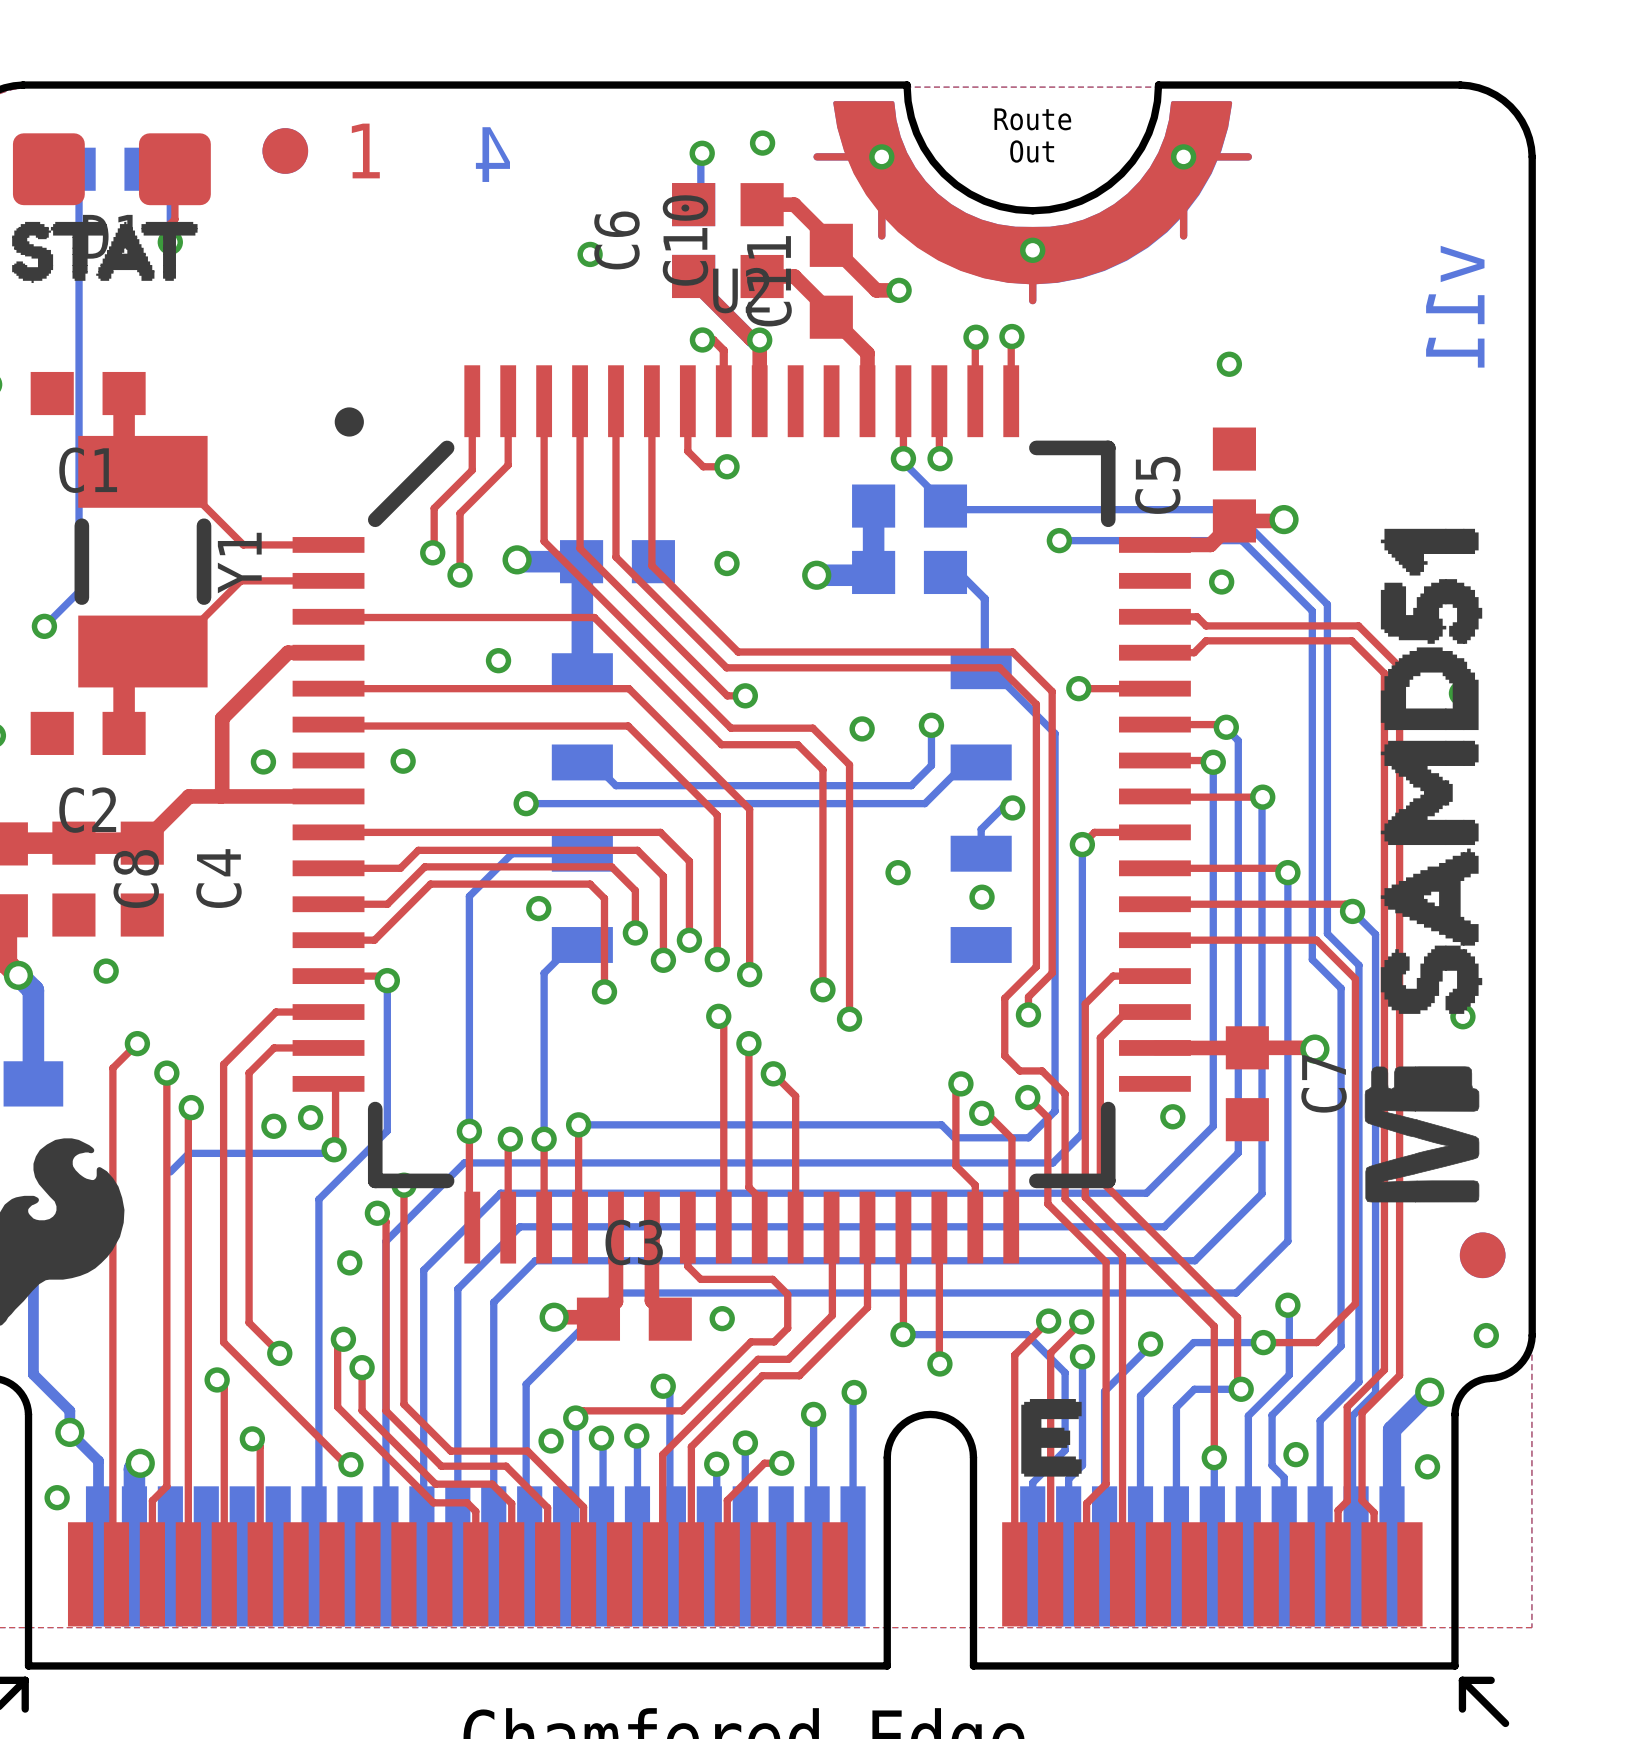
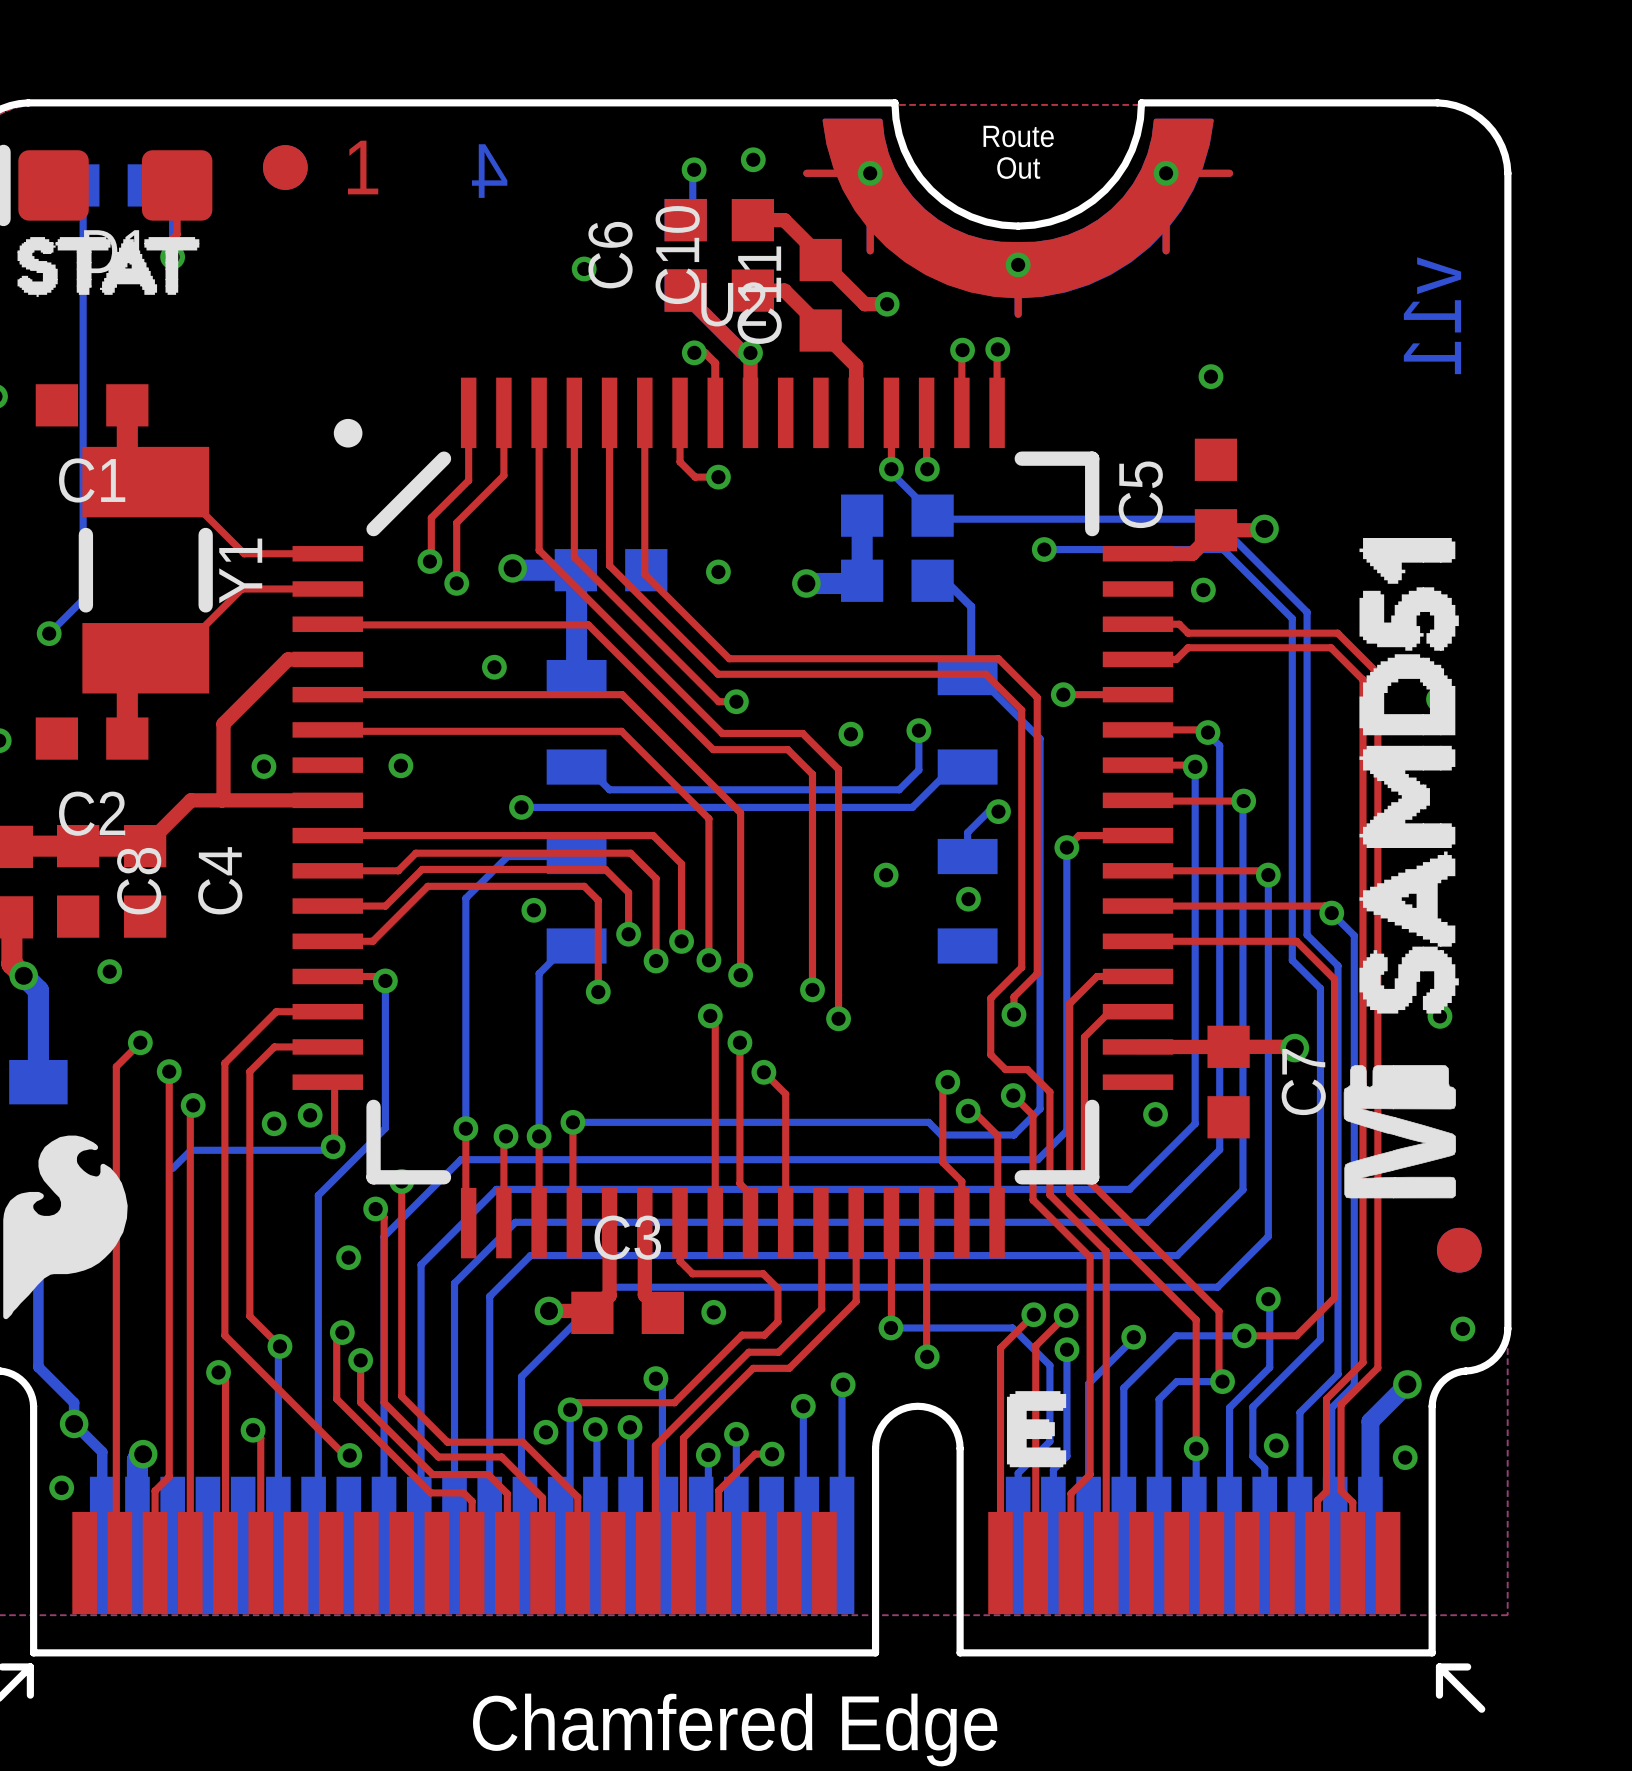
bottom track: none -> (278, 1348) (278, 1545)

